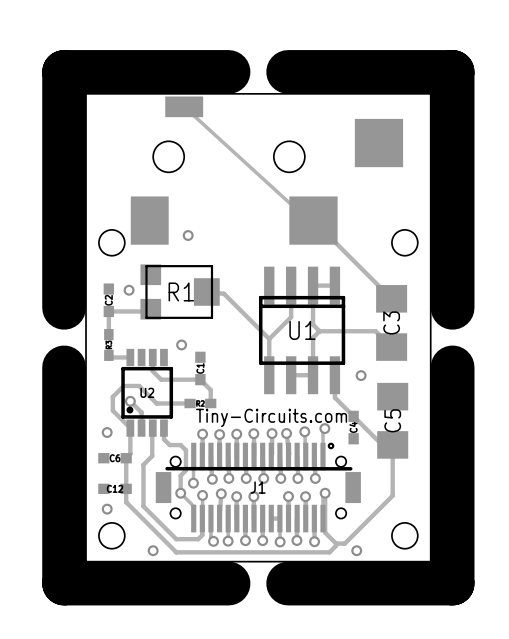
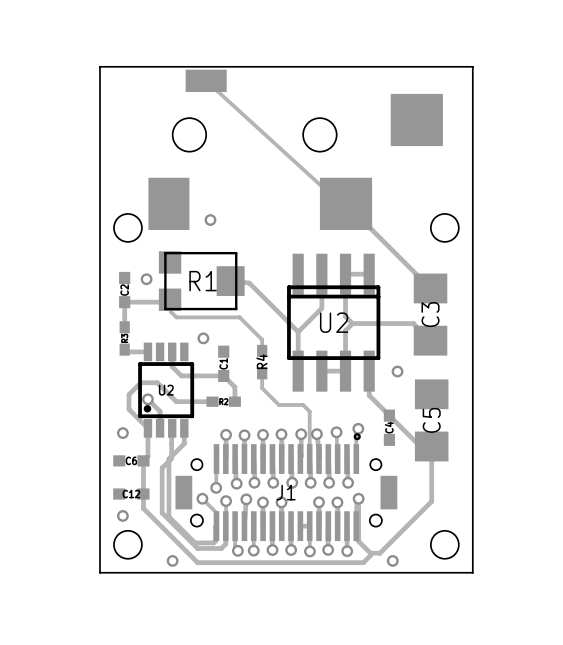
board edge: (228, 71) (64, 71) (64, 307) -> none
board edge: (288, 71) (452, 71) (452, 307) -> none
track: none -> (170, 299) (170, 311) (176, 317) (239, 317) (262, 339) (262, 350)
U1 name: U1 (302, 330) -> U2 (334, 322)
R4: none -> (262, 362)
board edge: (64, 367) (64, 583) (228, 583) -> none
board edge: (452, 367) (452, 583) (288, 583) -> none
track: none -> (262, 373) (262, 388) (278, 404) (303, 404) (309, 411) (309, 459)
text: Tiny-Circuits.com (271, 417) -> none
track: (163, 439) (169, 445) (180, 445) (185, 450) (185, 470) (180, 475) (180, 493) -> (184, 440) (184, 443) (168, 459) (168, 516) (195, 542) (213, 542) (215, 541) (216, 526)
J1 footprint: [155, 442, 361, 533] -> [175, 433, 398, 542]

